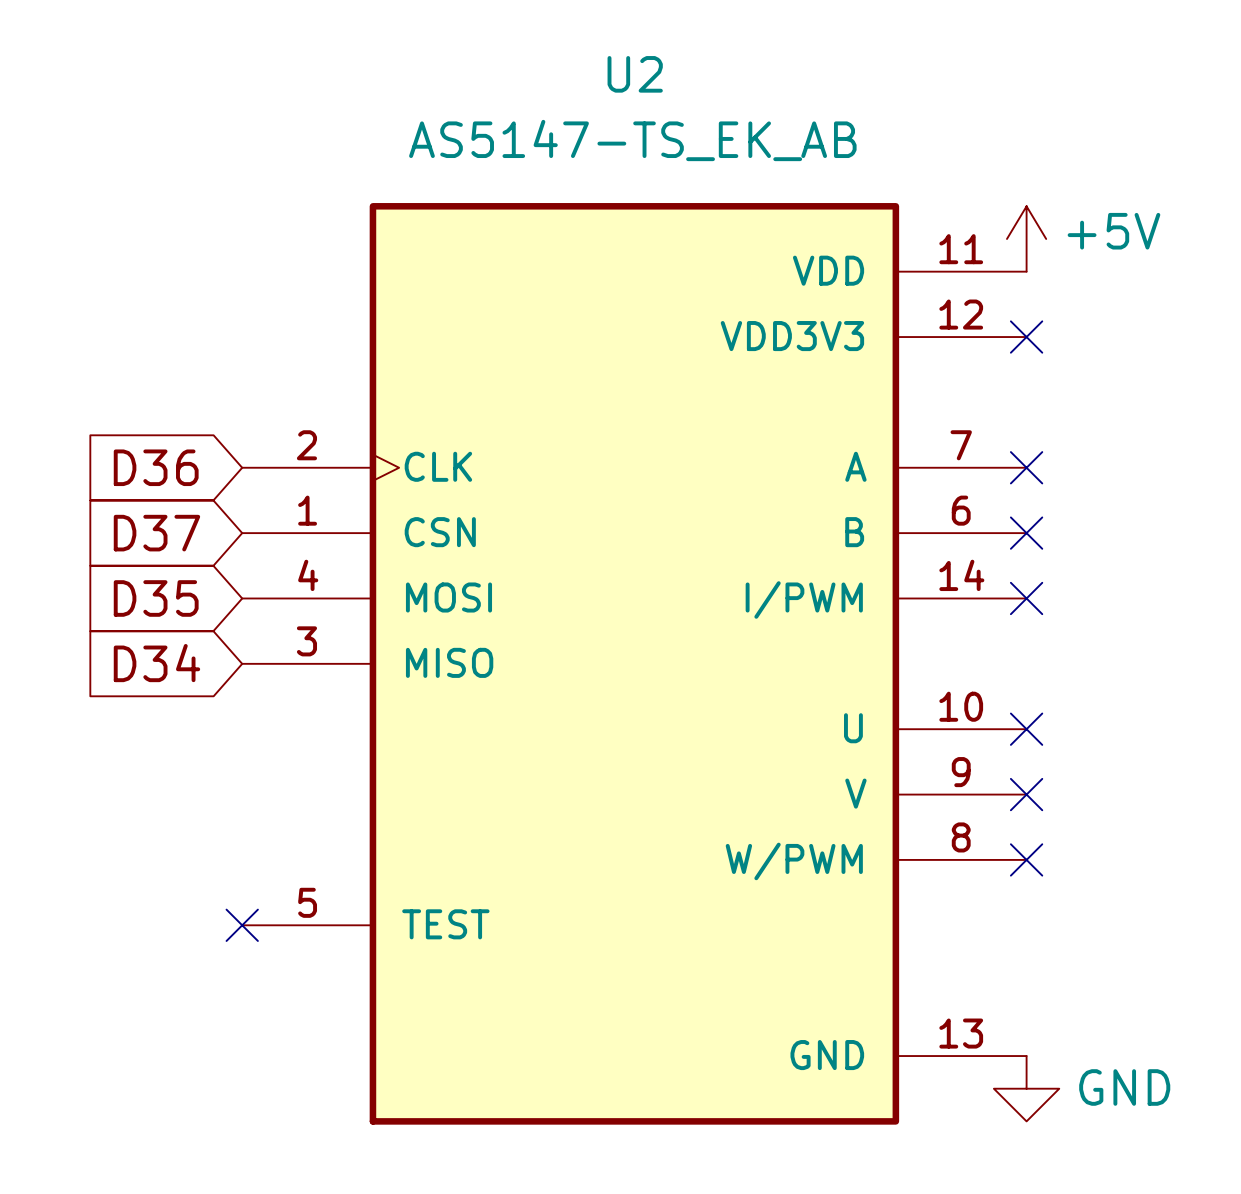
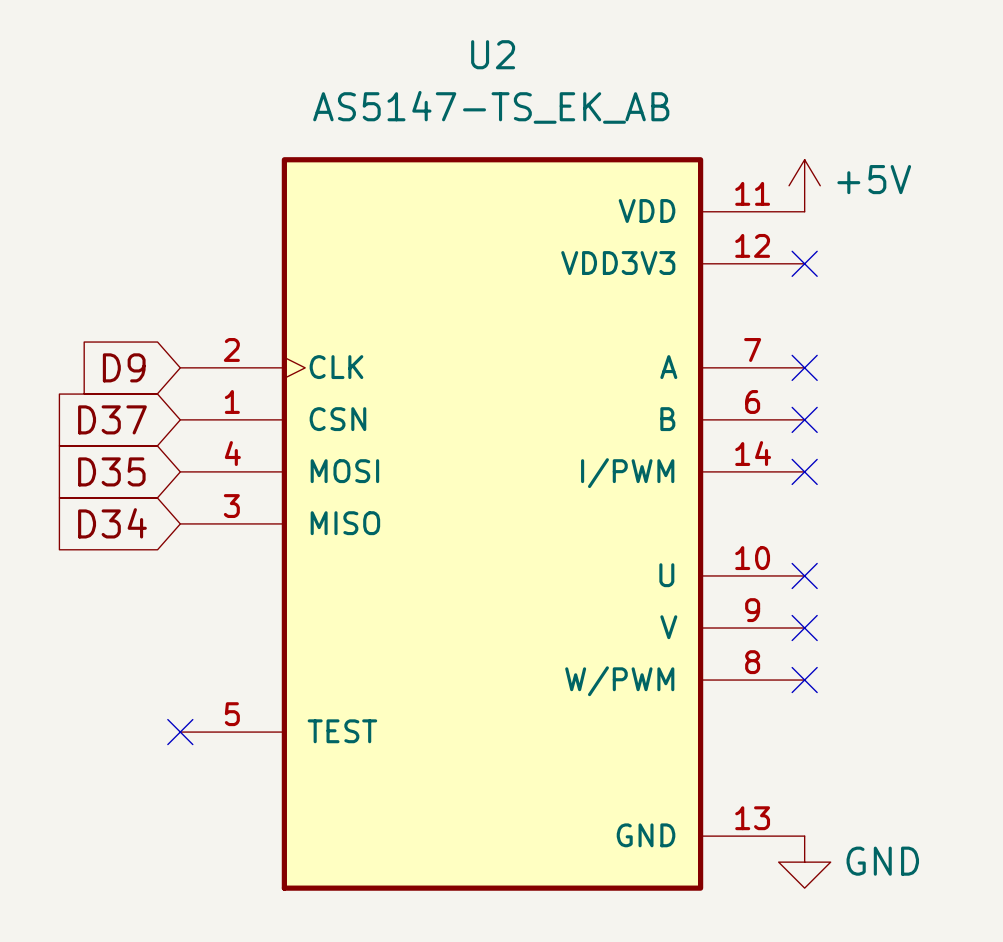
global label: D36 (156, 467) -> D9 (124, 367)

